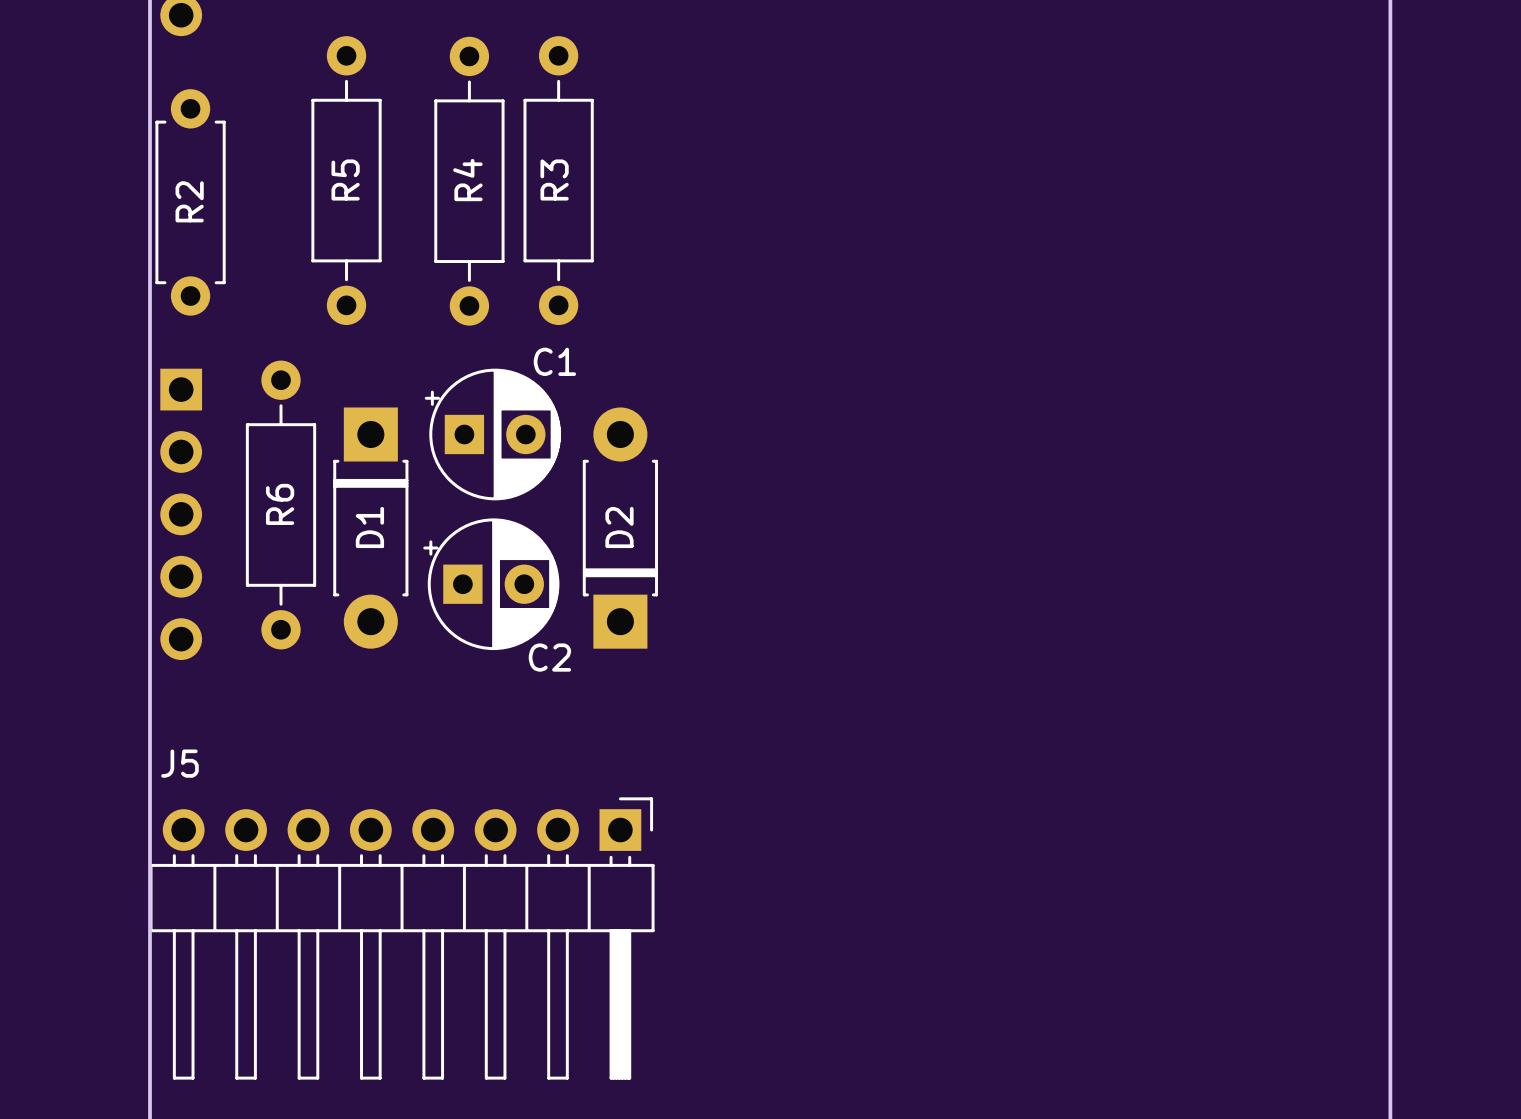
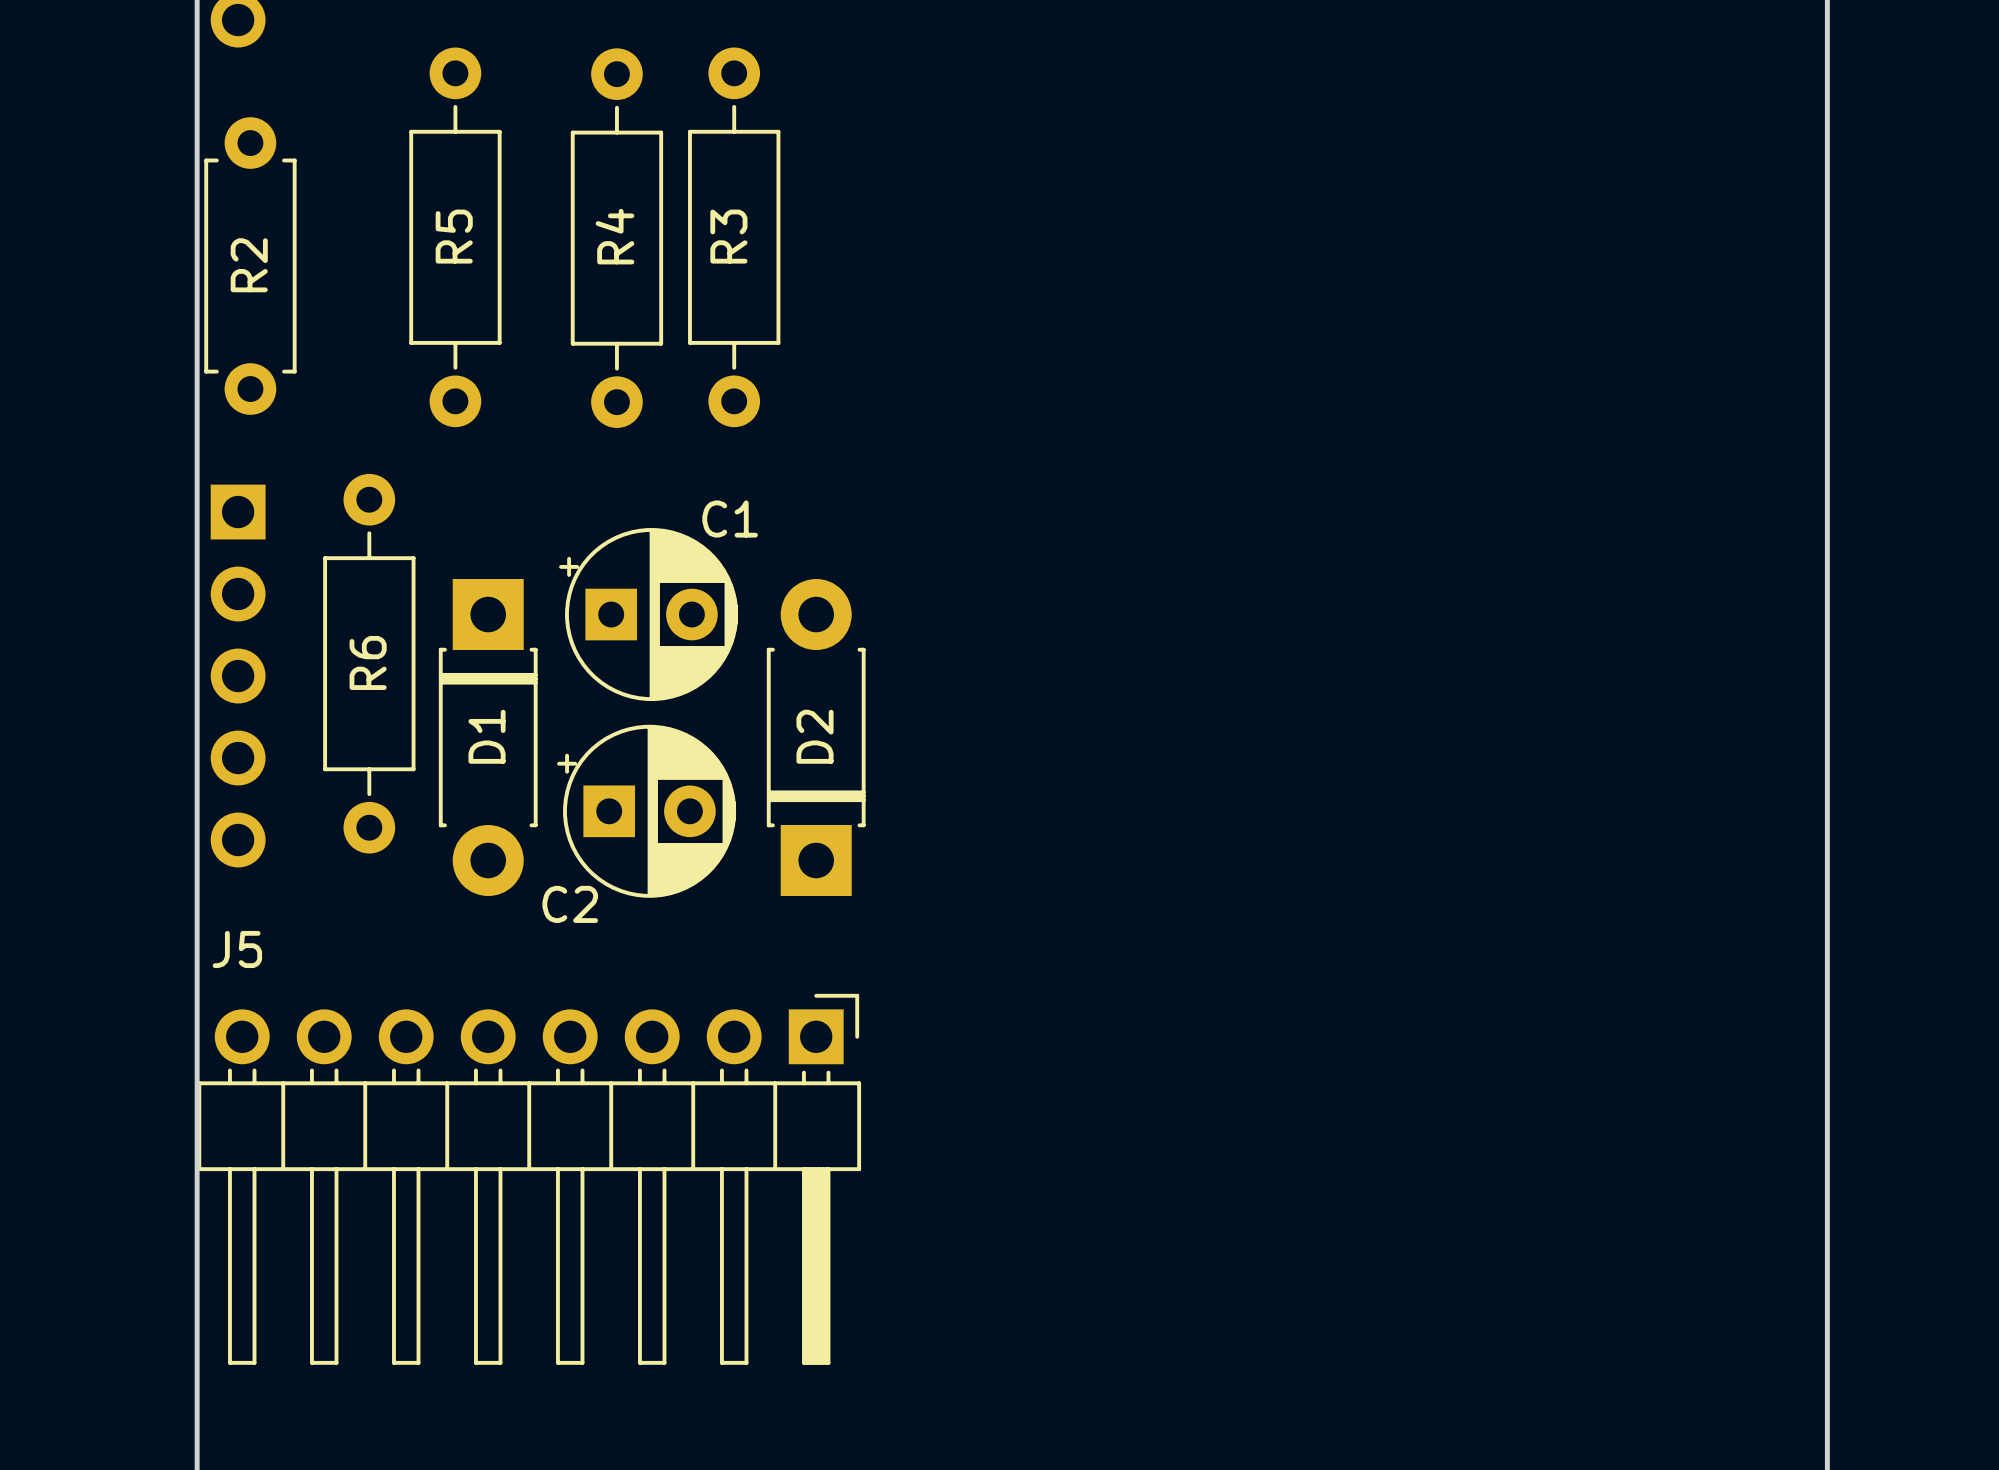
C1 position: (492, 434) -> (648, 614)
D1 position: (370, 528) -> (488, 737)
D2 position: (620, 528) -> (816, 737)
C2 position: (491, 584) -> (646, 811)
C2 name position: C2 (549, 657) -> C2 (570, 904)
J5 position: (402, 938) -> (529, 1179)

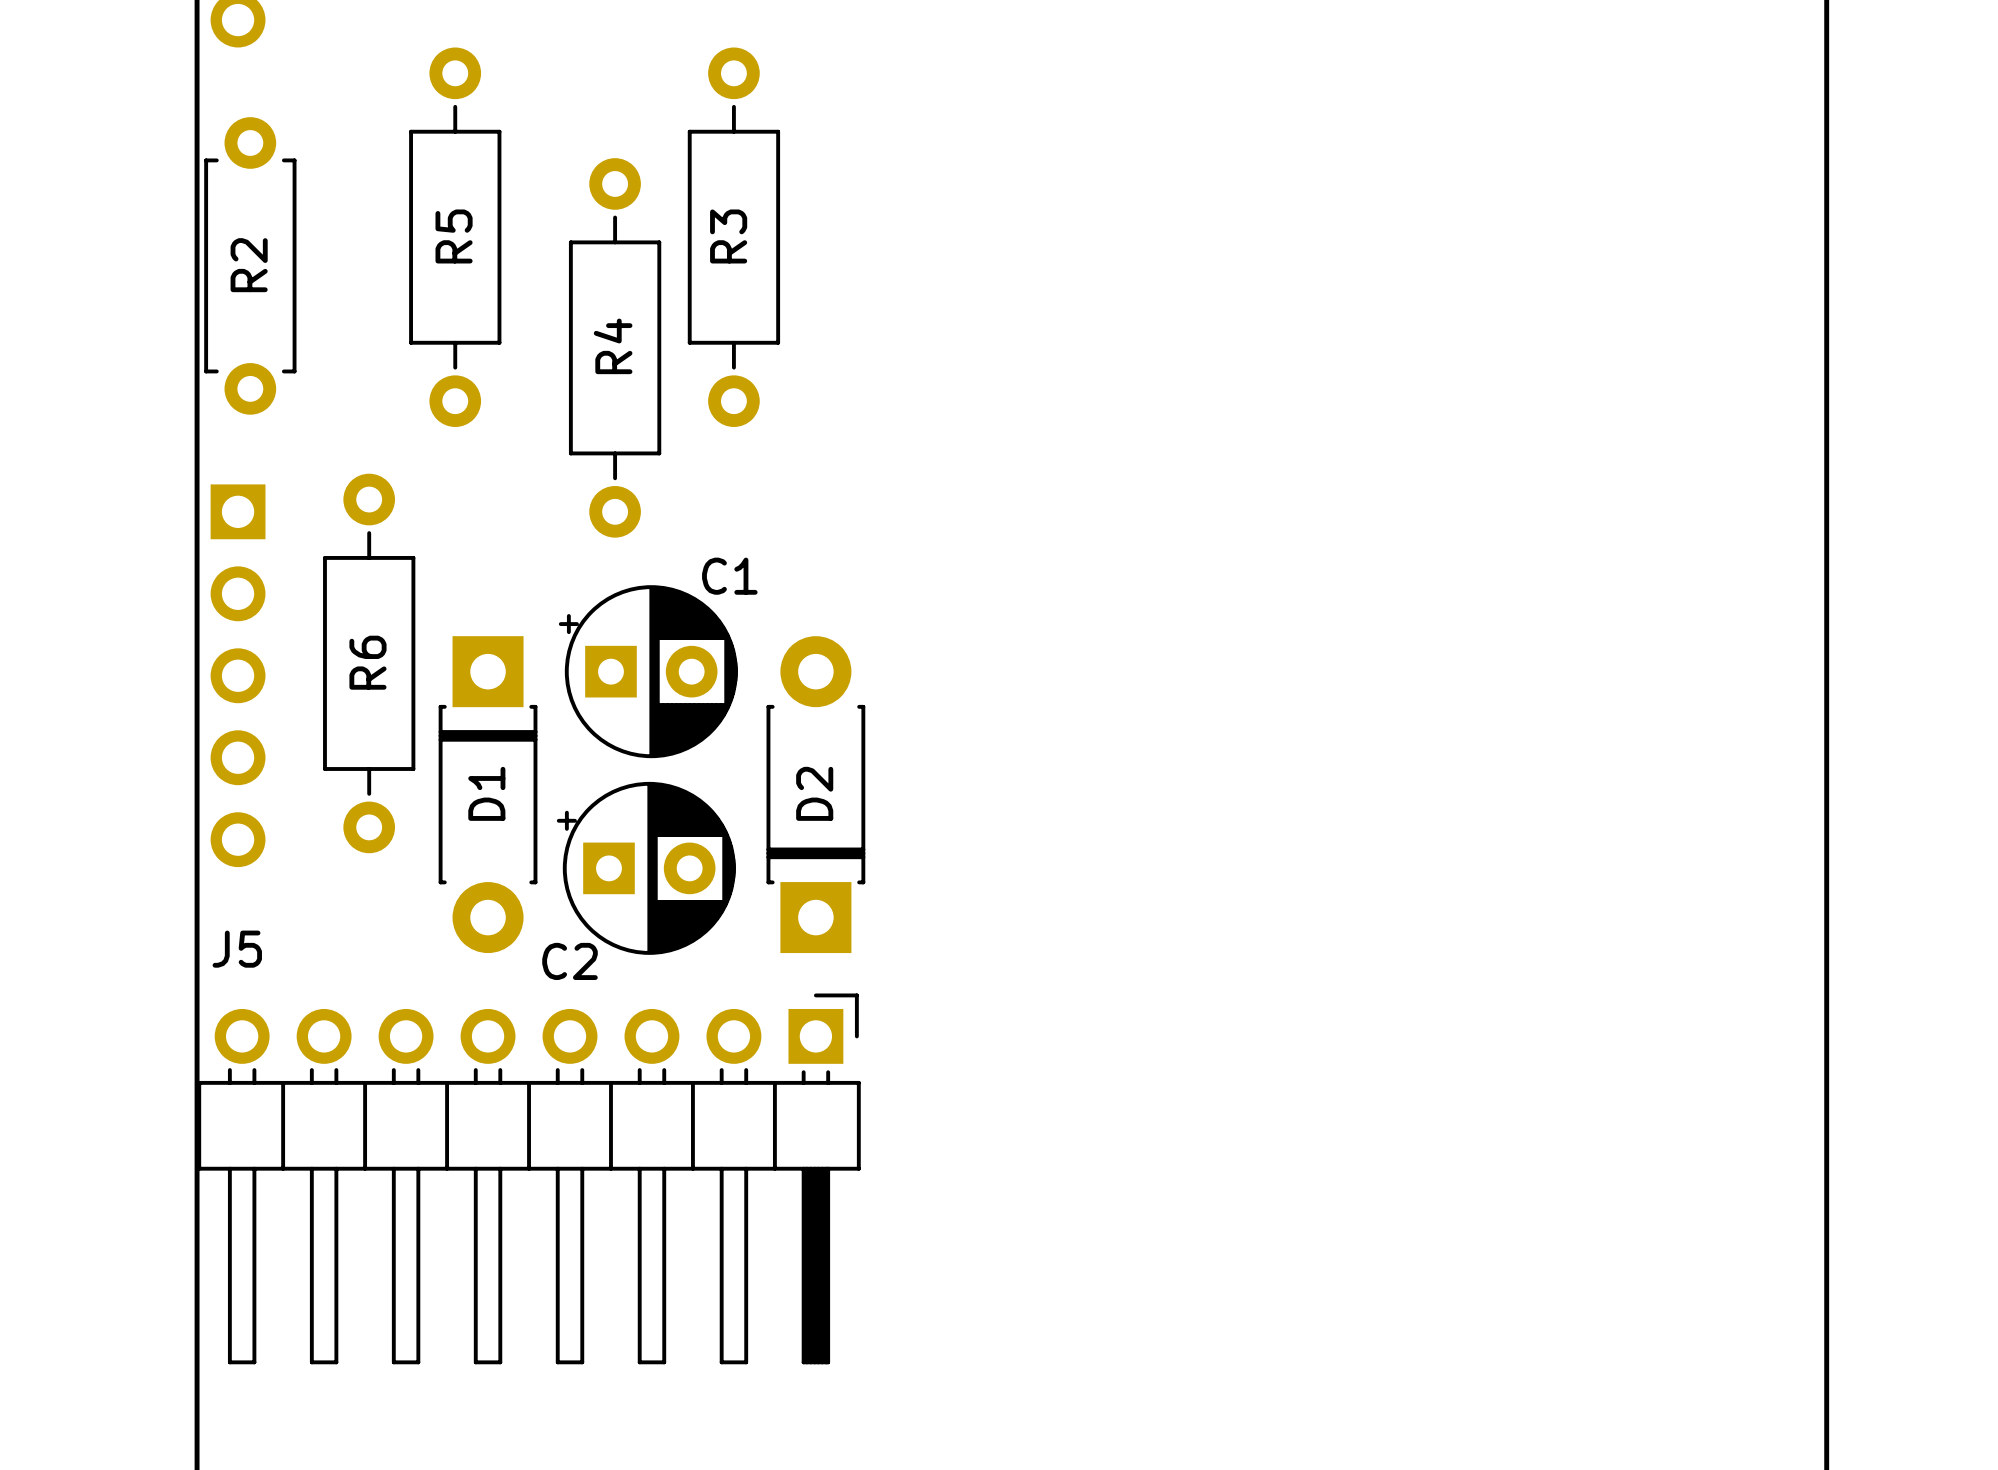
R4 position: (616, 238) -> (615, 347)
C1 position: (648, 614) -> (648, 671)
D1 position: (488, 737) -> (488, 794)
D2 position: (816, 737) -> (815, 794)
C2 position: (646, 811) -> (646, 868)

